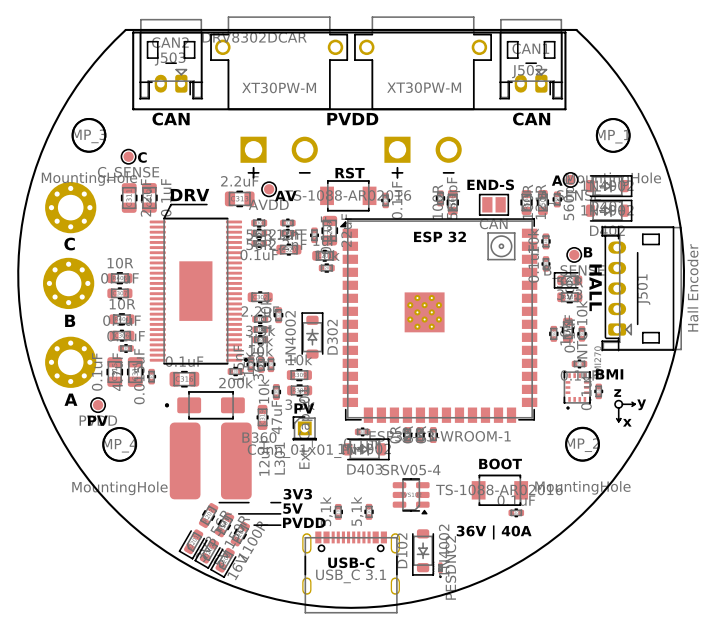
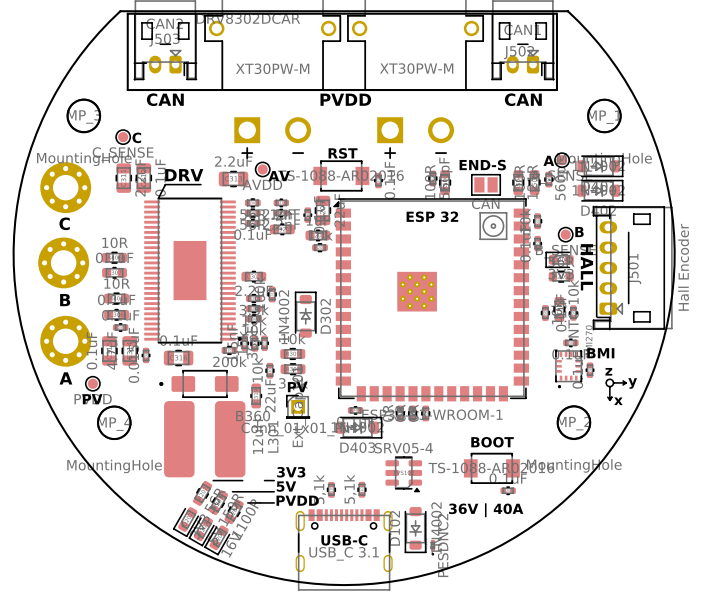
part value: 47uF (276, 417) -> 22uF (270, 395)

